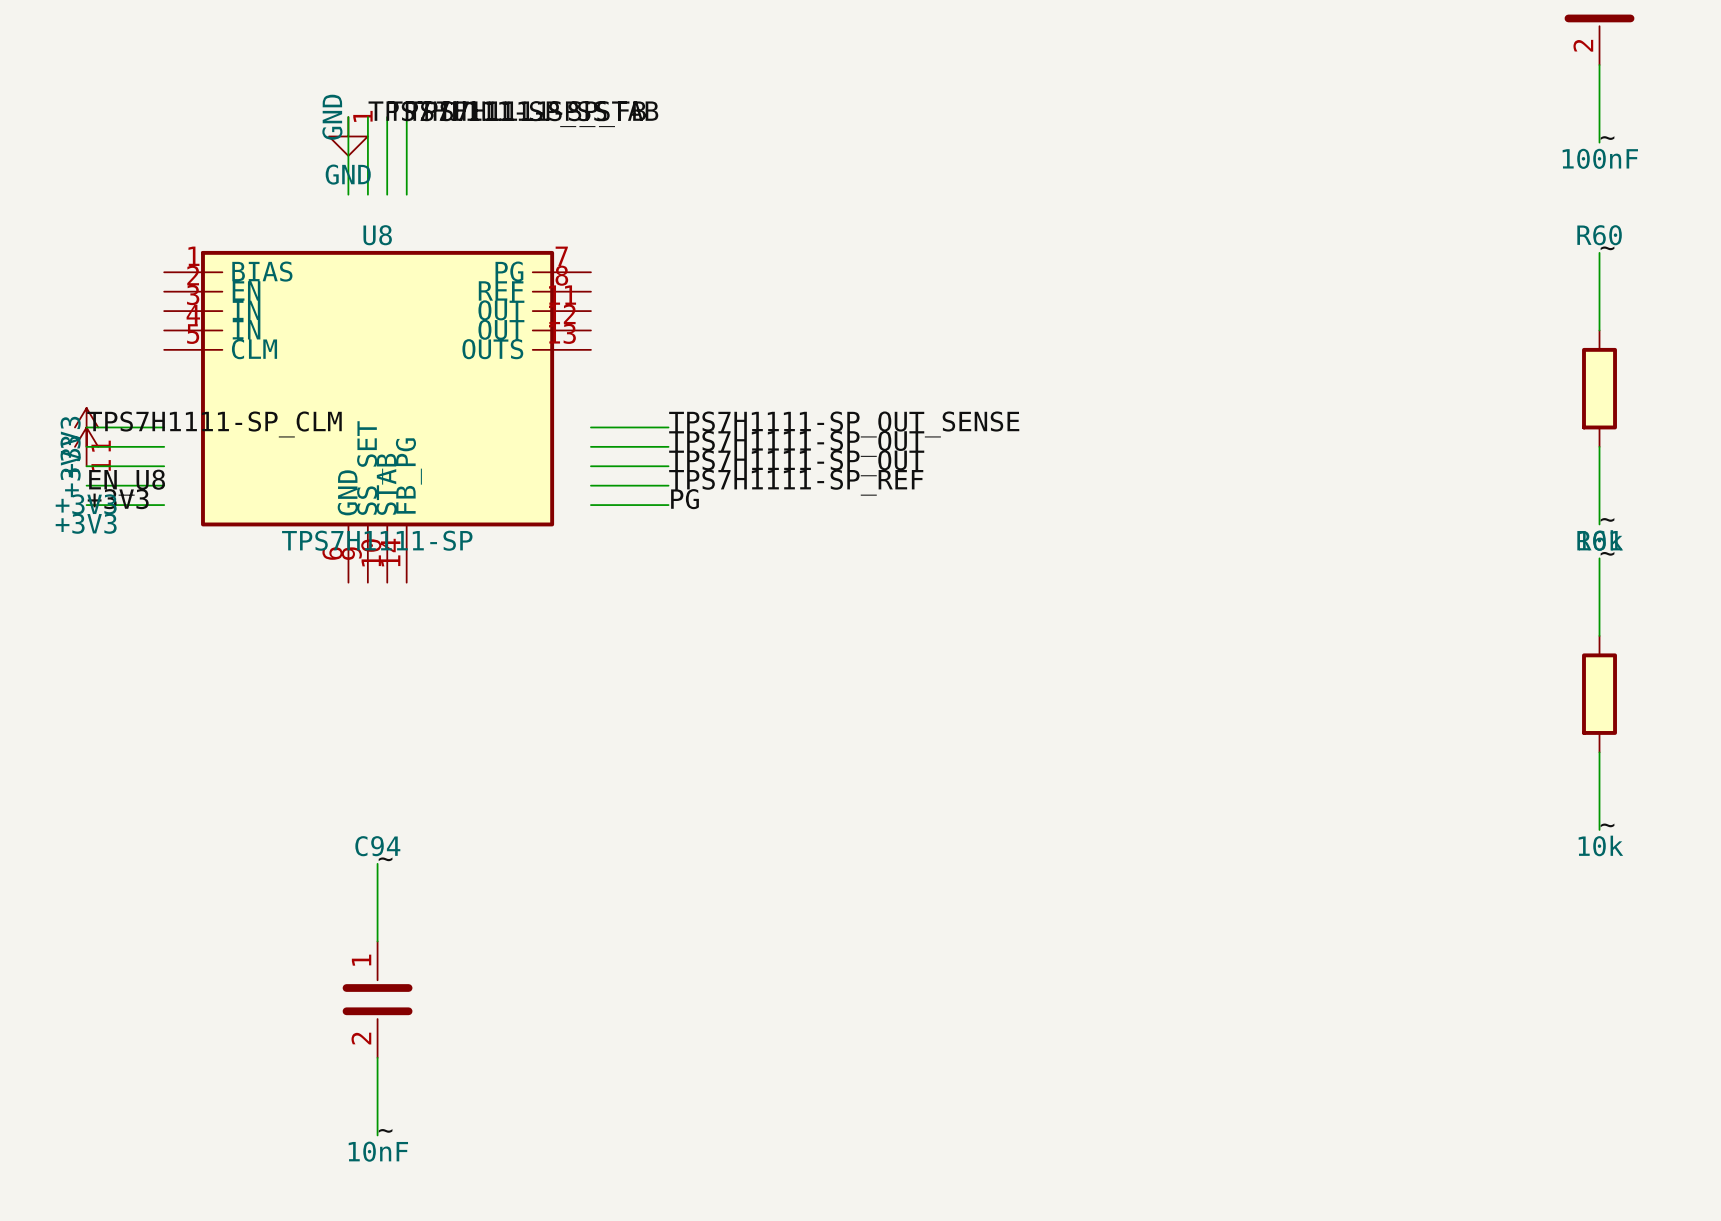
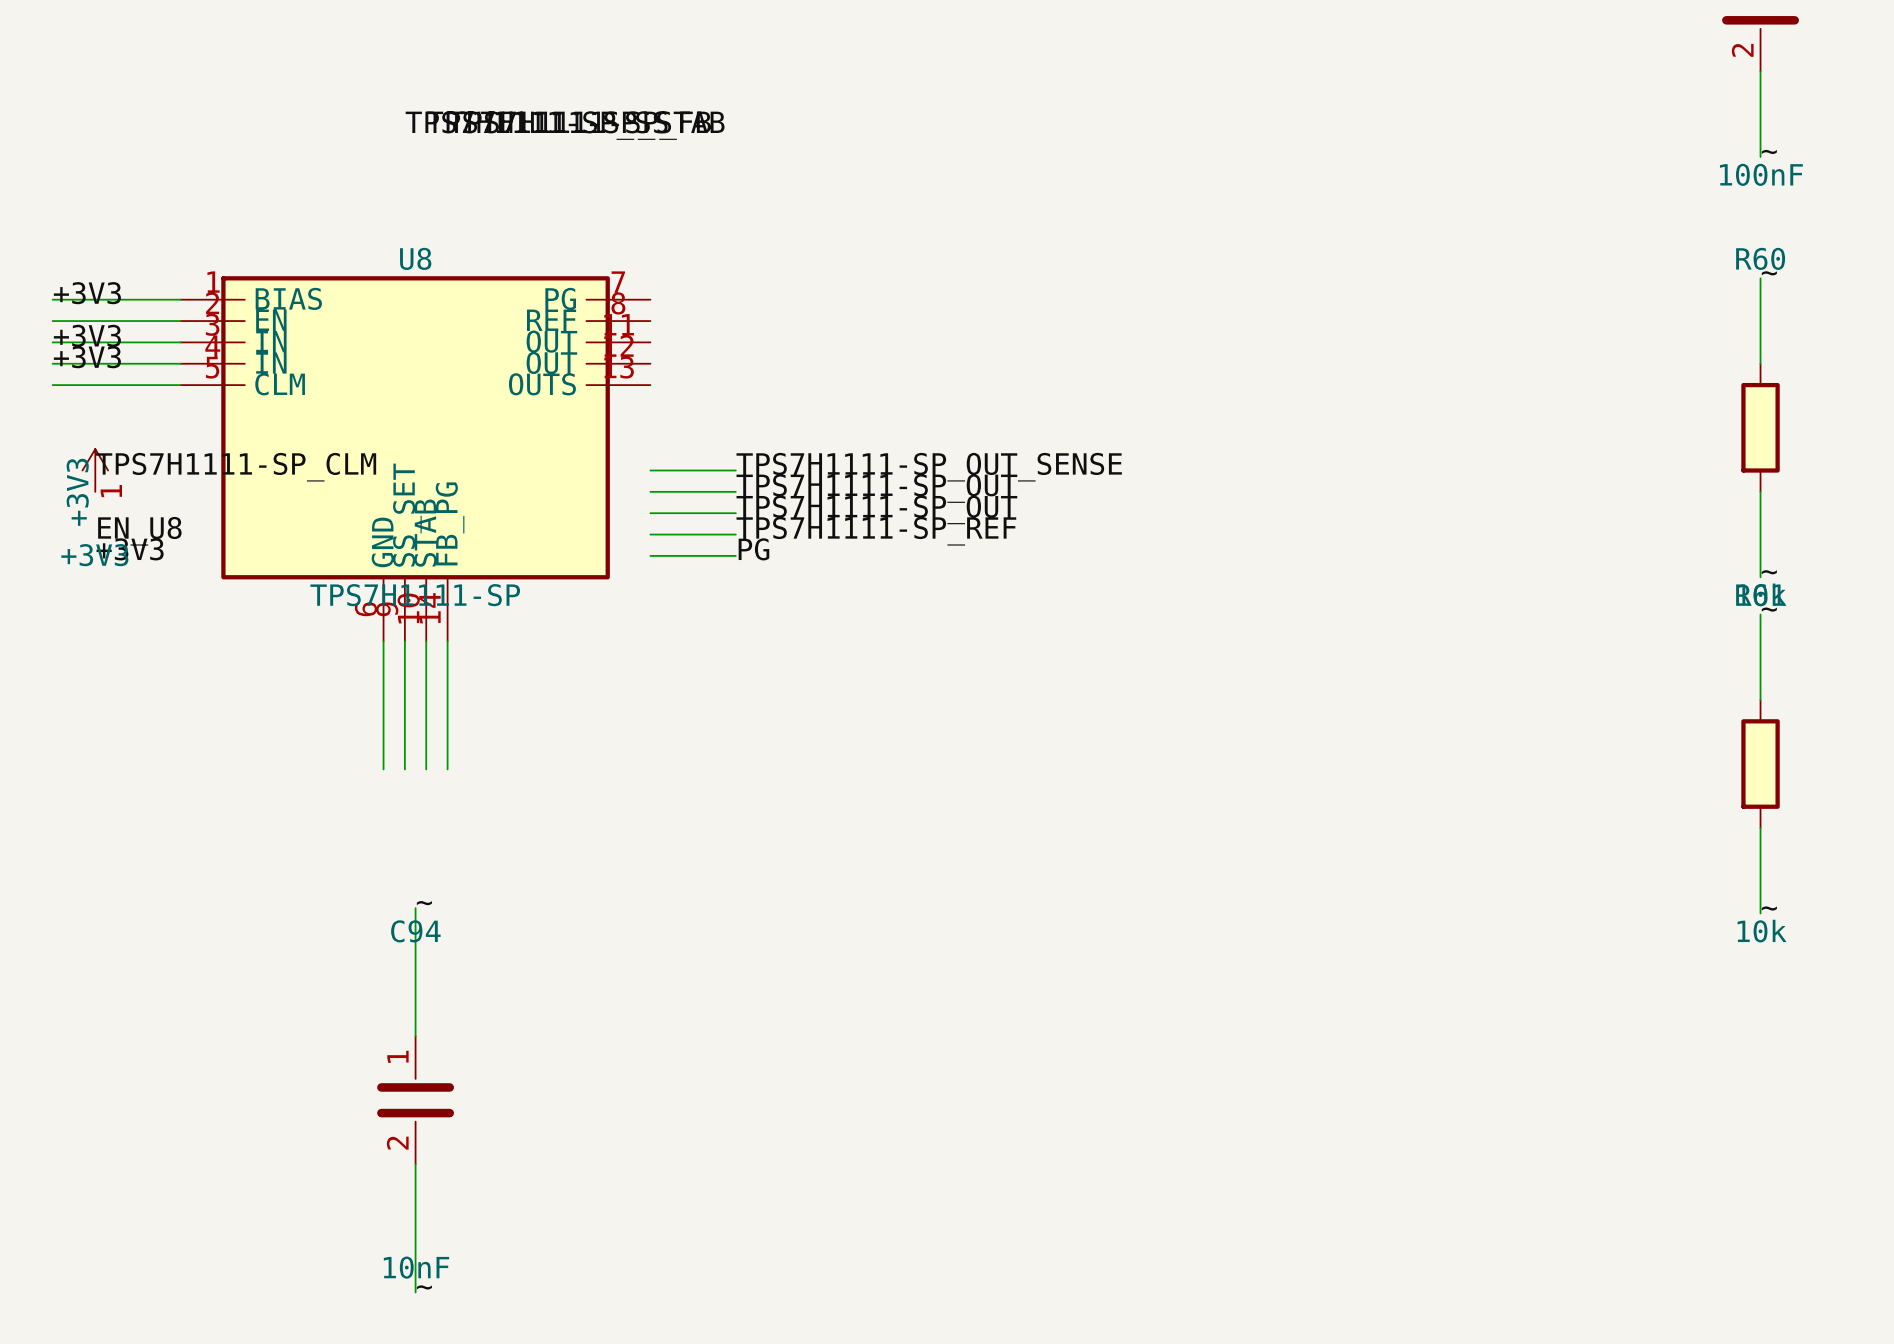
wire: (348, 117) (348, 194) -> none
wire: (367, 117) (367, 194) -> none
wire: (387, 117) (387, 194) -> none
wire: (406, 117) (406, 194) -> none
power symbol: GND (348, 136) -> none
label: none -> +3V3 (87, 293)
wire: none -> (52, 299) (180, 299)
wire: none -> (52, 321) (180, 321)
label: none -> +3V3 (87, 335)
wire: none -> (52, 342) (180, 342)
label: none -> +3V3 (87, 357)
wire: none -> (52, 363) (180, 363)
wire: none -> (52, 385) (180, 385)
wire: (86, 427) (164, 427) -> none
wire: (86, 446) (164, 446) -> none
power symbol: +3V3 (86, 446) -> none
wire: (86, 466) (164, 466) -> none
wire: (86, 485) (164, 485) -> none
wire: (86, 505) (164, 505) -> none
wire: none -> (383, 641) (383, 769)
wire: none -> (404, 641) (404, 769)
wire: none -> (426, 641) (426, 769)
wire: none -> (447, 641) (447, 769)
wire: none -> (415, 908) (415, 950)
label position: ~ (385, 859) -> ~ (424, 903)
label position: ~ (385, 1130) -> ~ (424, 1287)
wire: none -> (415, 1249) (415, 1292)

